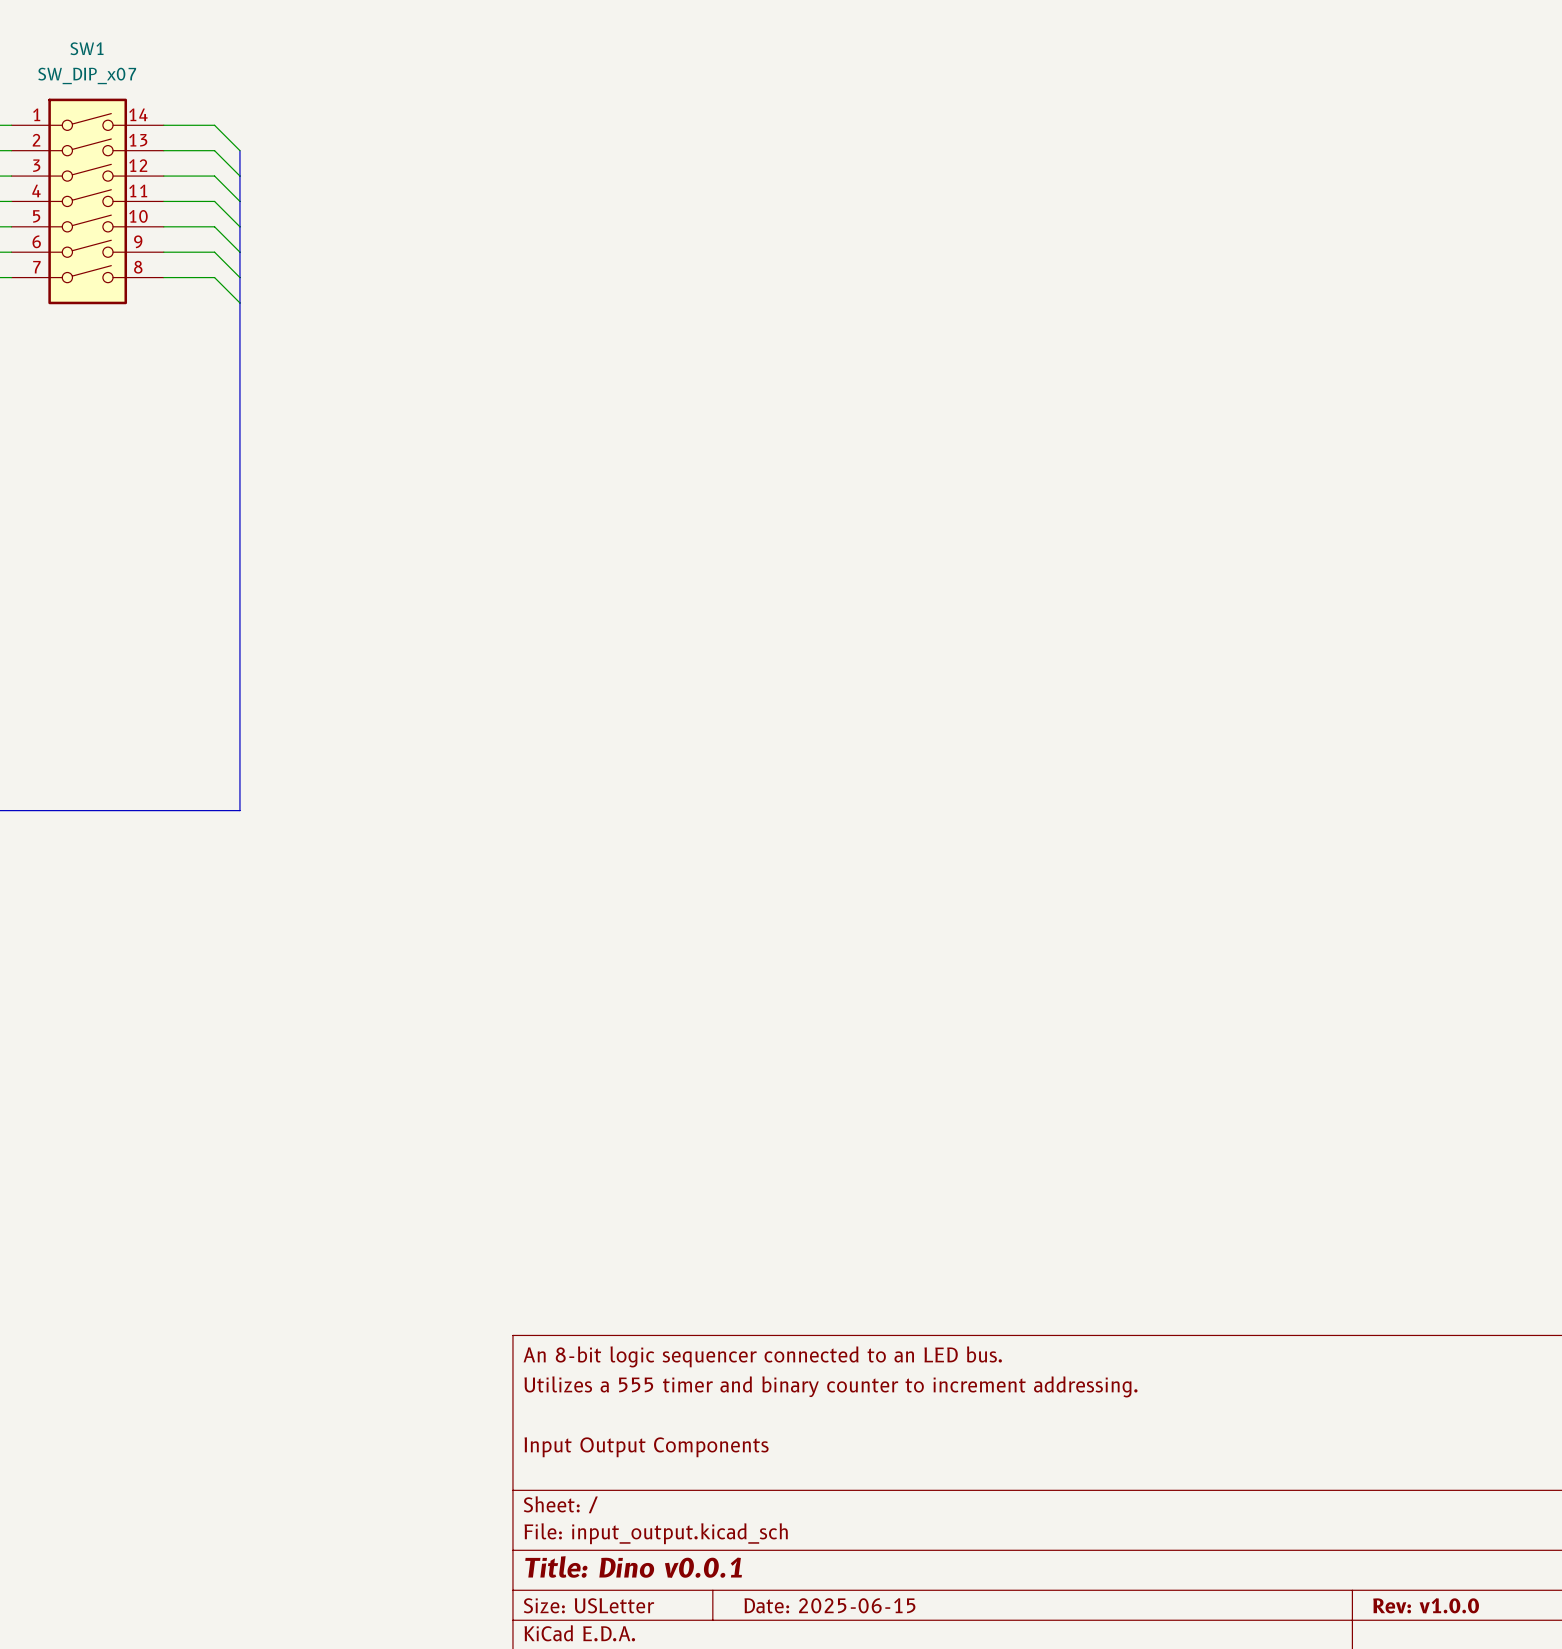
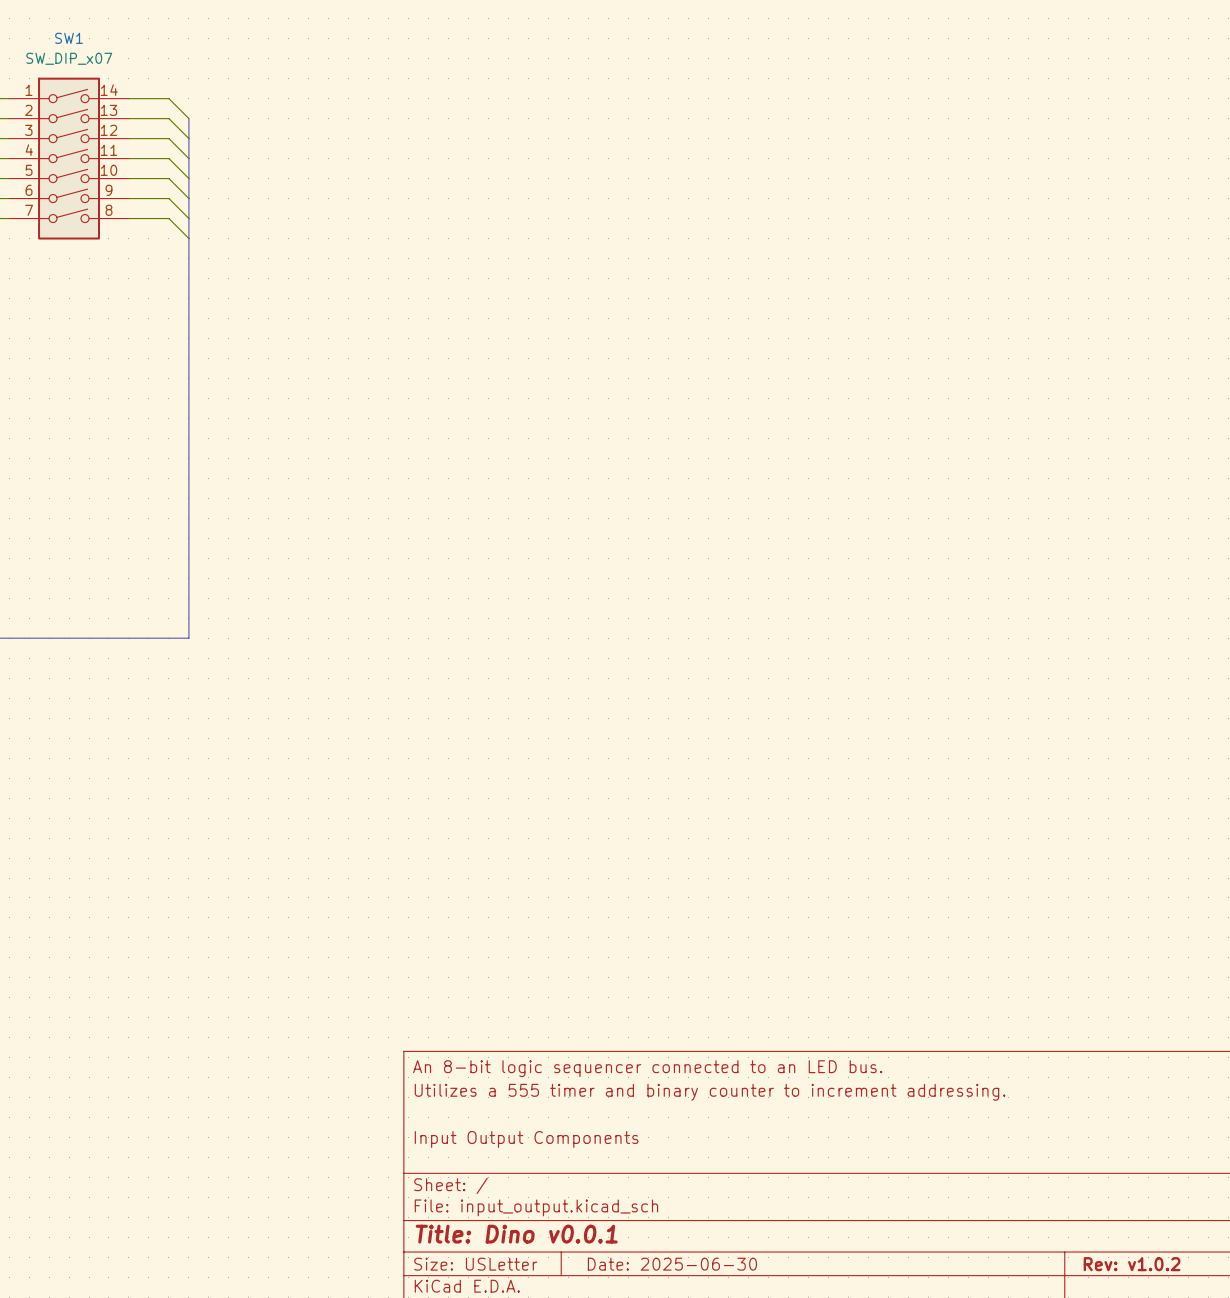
title block: Date: 2025-06-15 (829, 1605) -> Date: 2025-06-30 (672, 1264)
title block: Rev: v1.0.0 (1426, 1605) -> Rev: v1.0.2 (1132, 1264)

